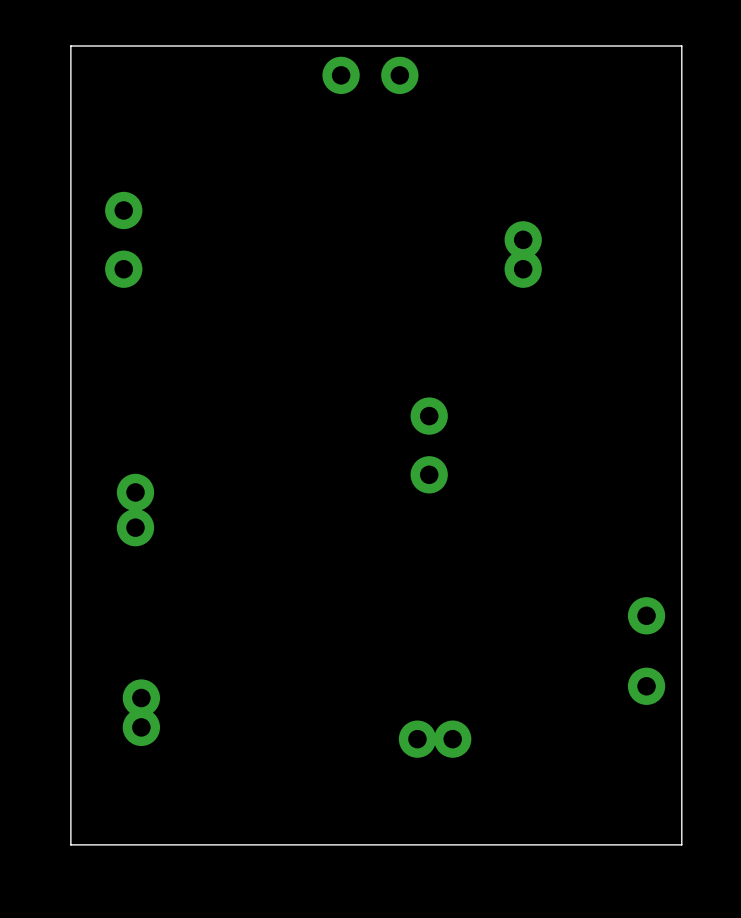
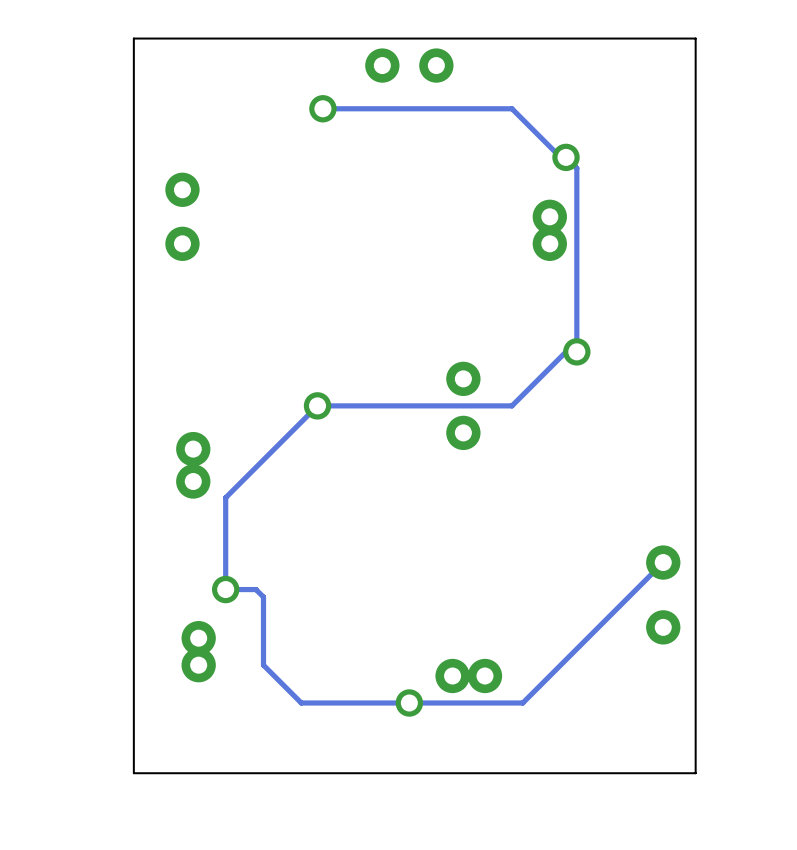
track: none -> (322, 108) (511, 108) (560, 157) (566, 157) (576, 168) (576, 351) (566, 351) (511, 405) (317, 405) (225, 497) (225, 589) (256, 589) (263, 597) (263, 665) (301, 703) (522, 703) (663, 562)
via: none -> (322, 108)
via: none -> (566, 157)
via: none -> (576, 351)
via: none -> (317, 405)
via: none -> (225, 589)
via: none -> (409, 703)

